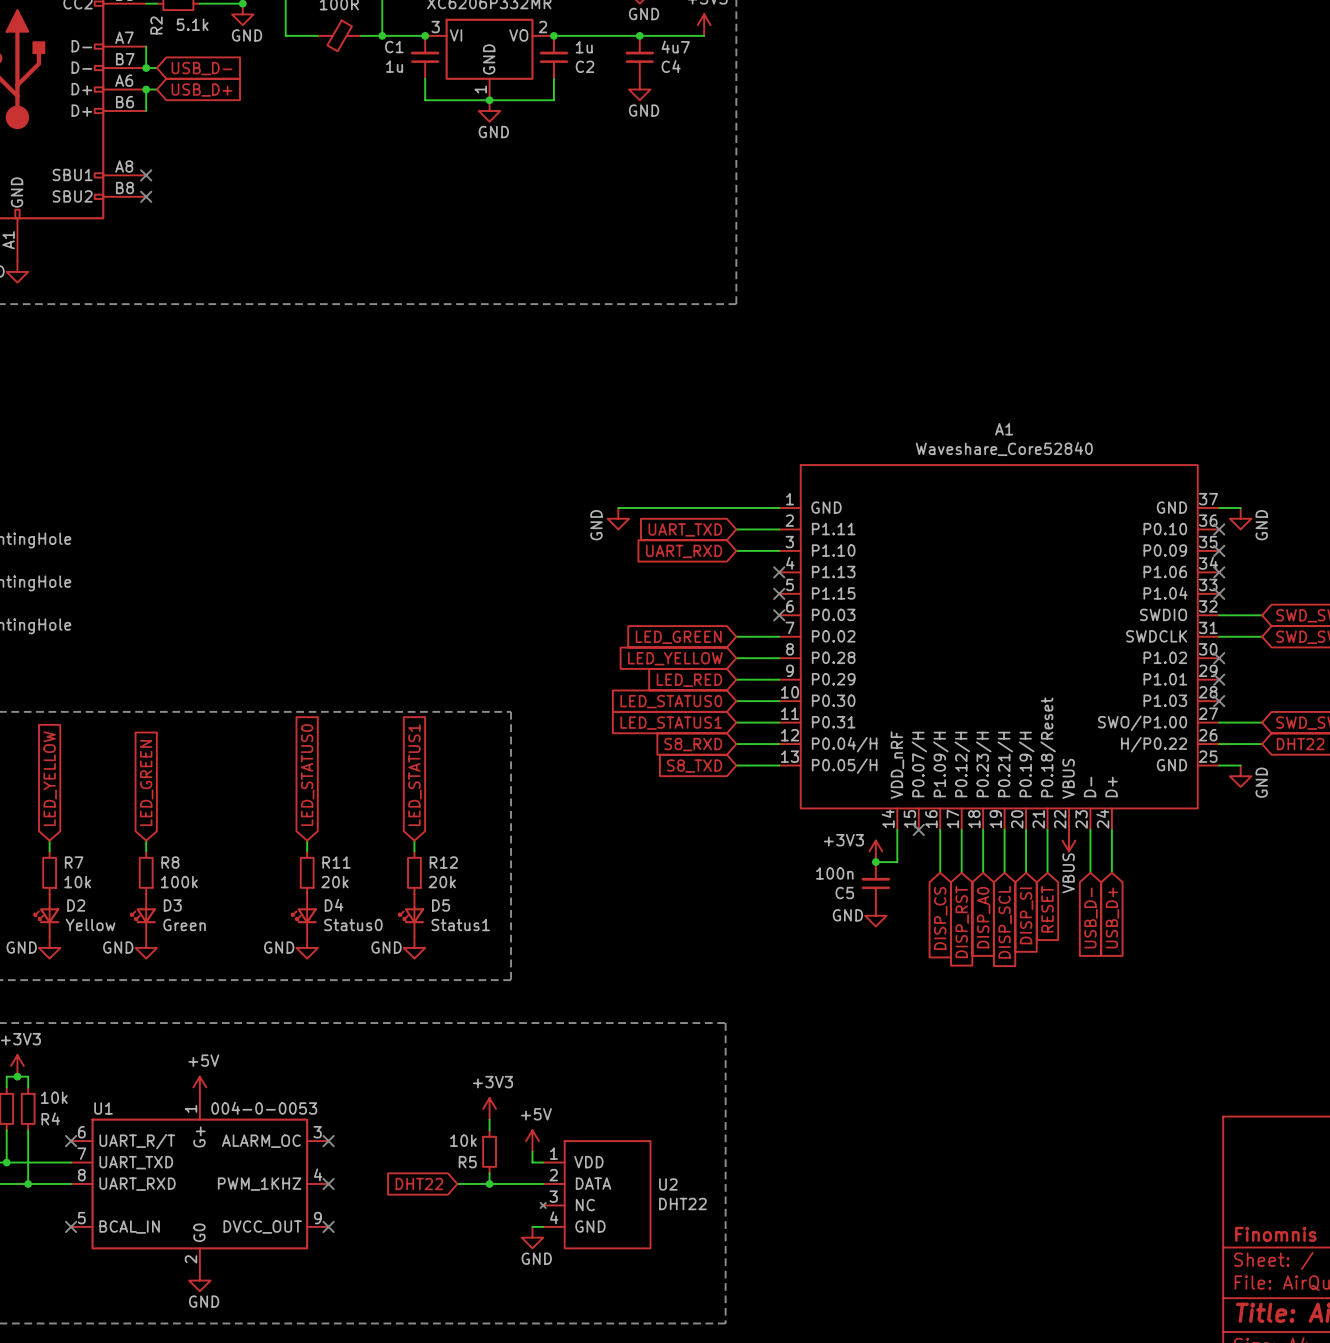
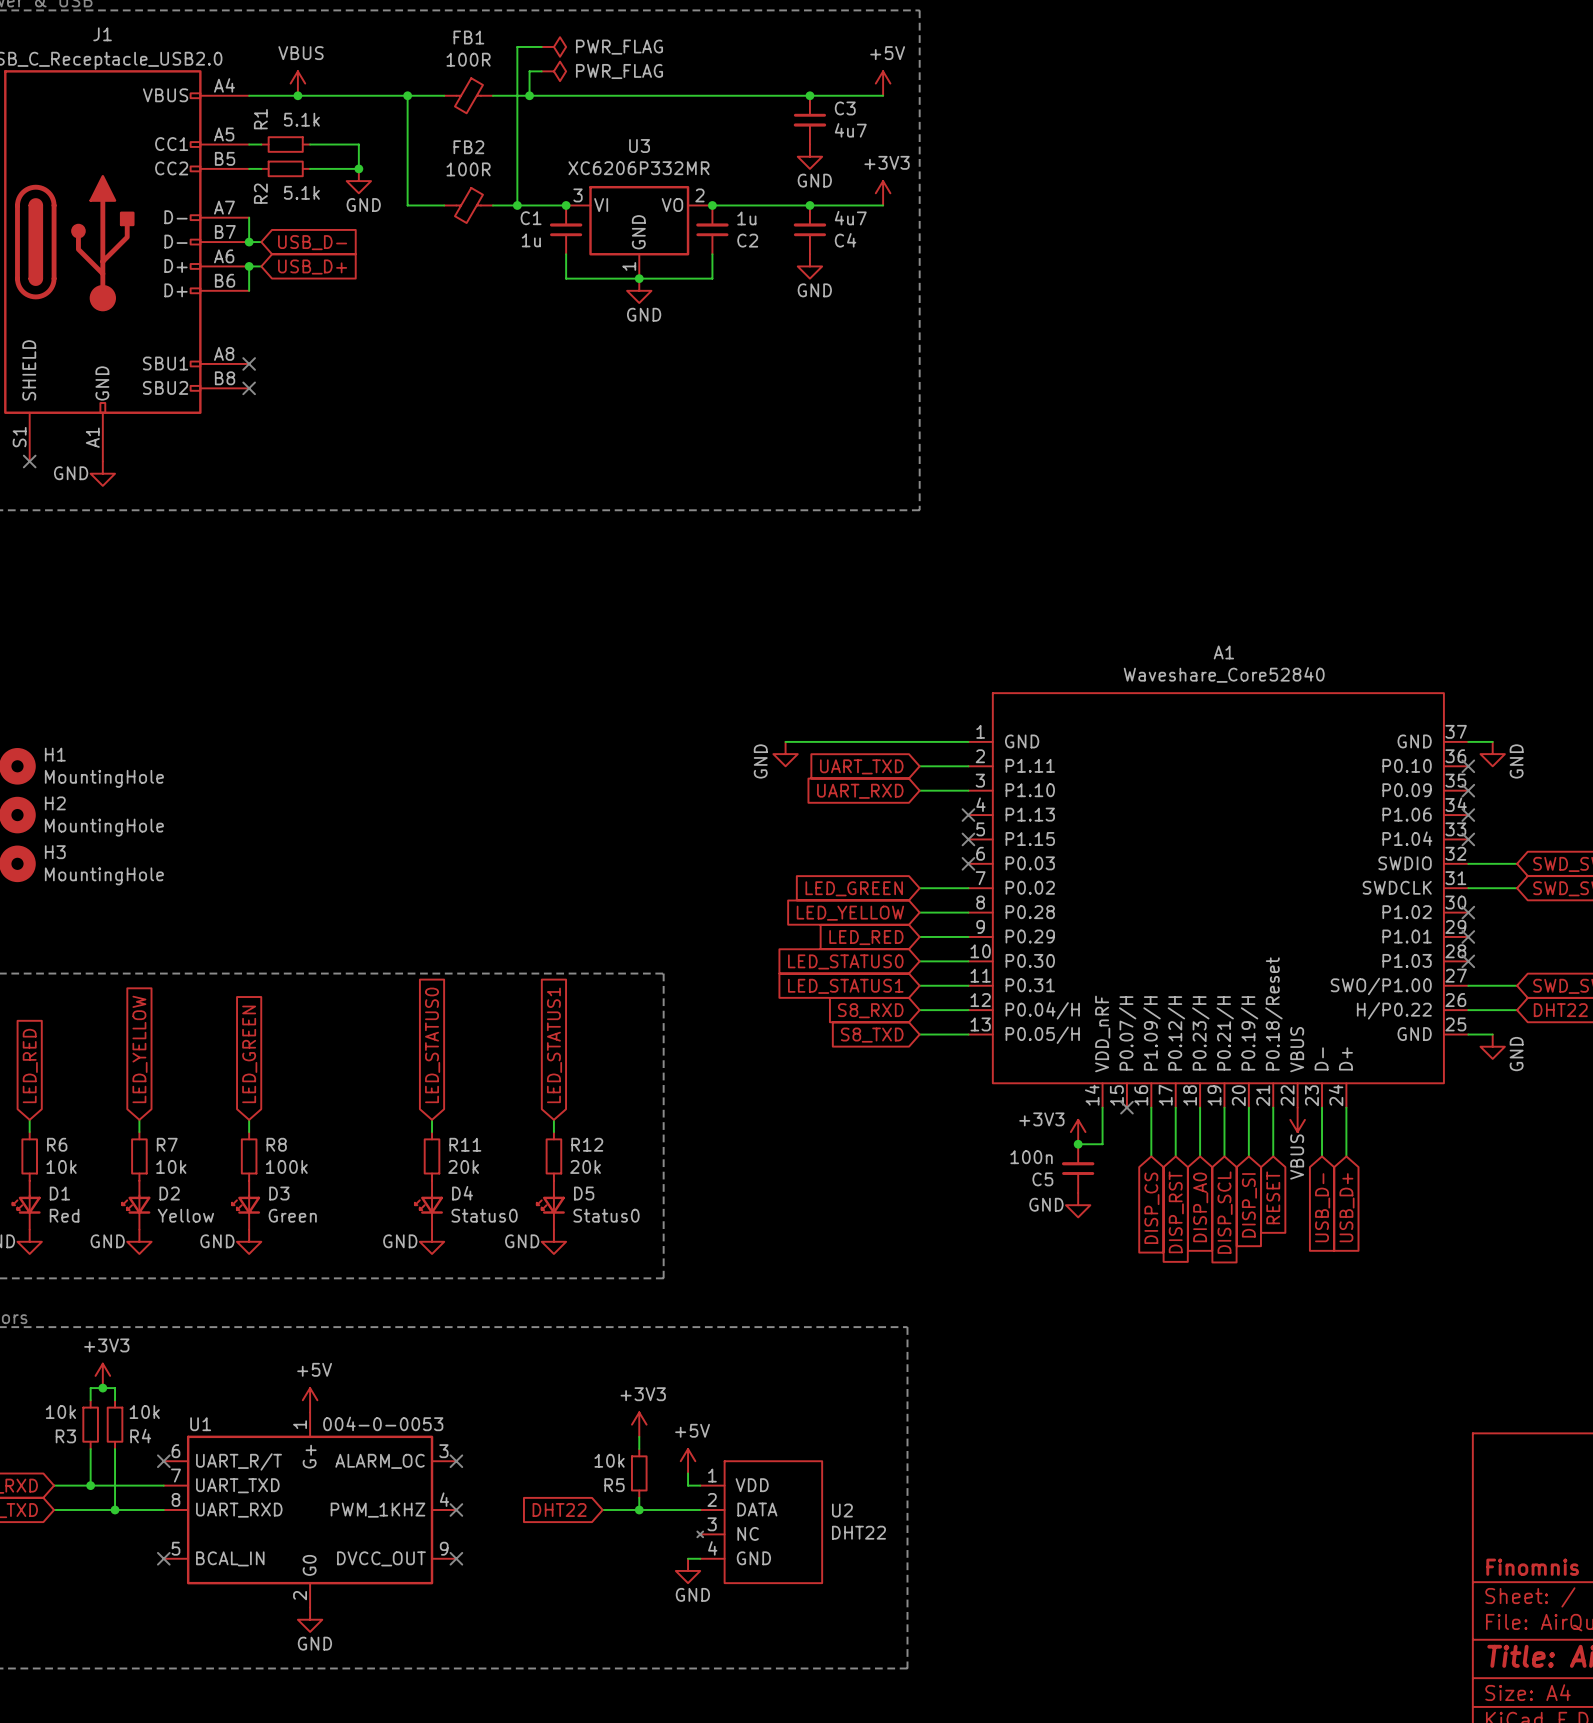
D5 value: Status1 (460, 925) -> Status0 (606, 1215)

